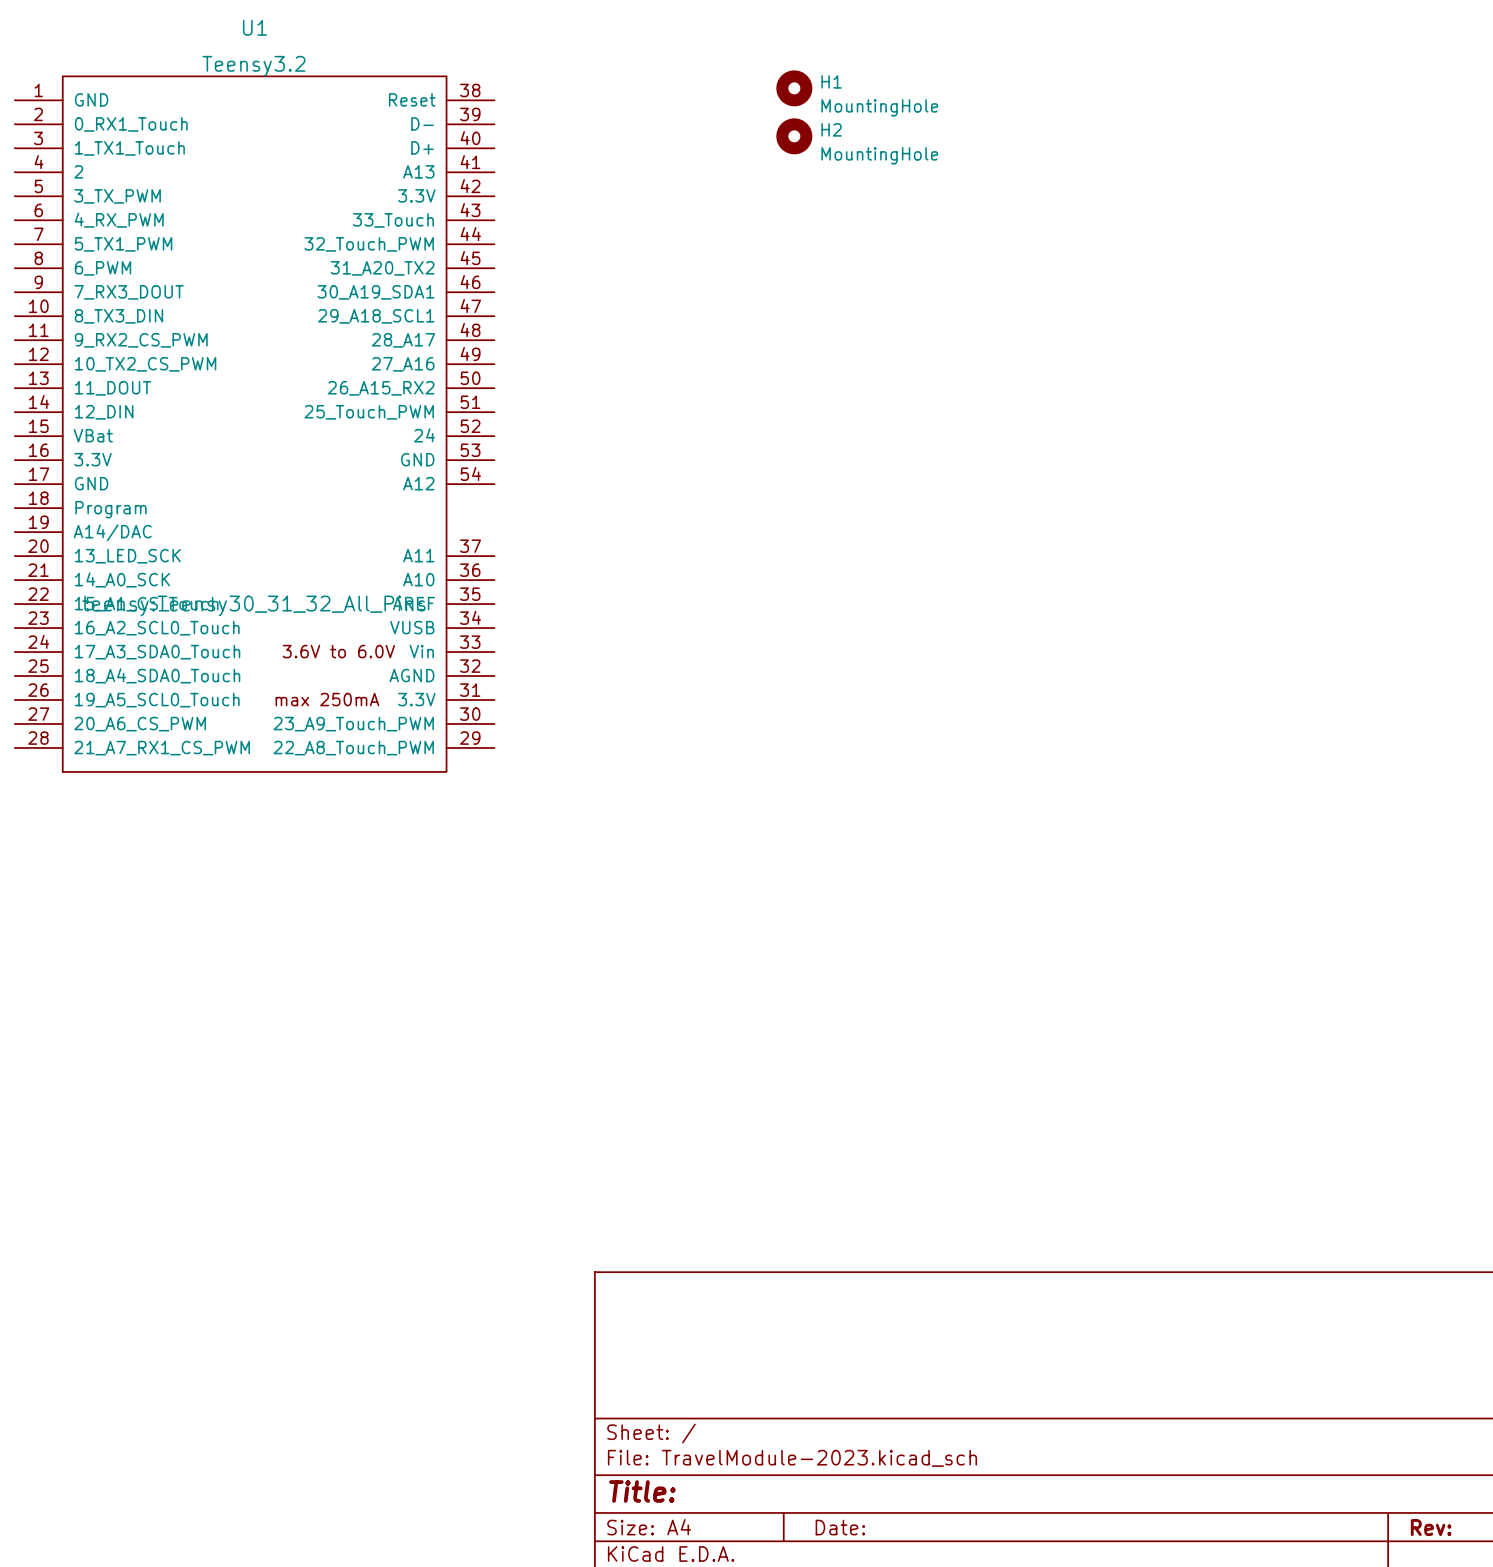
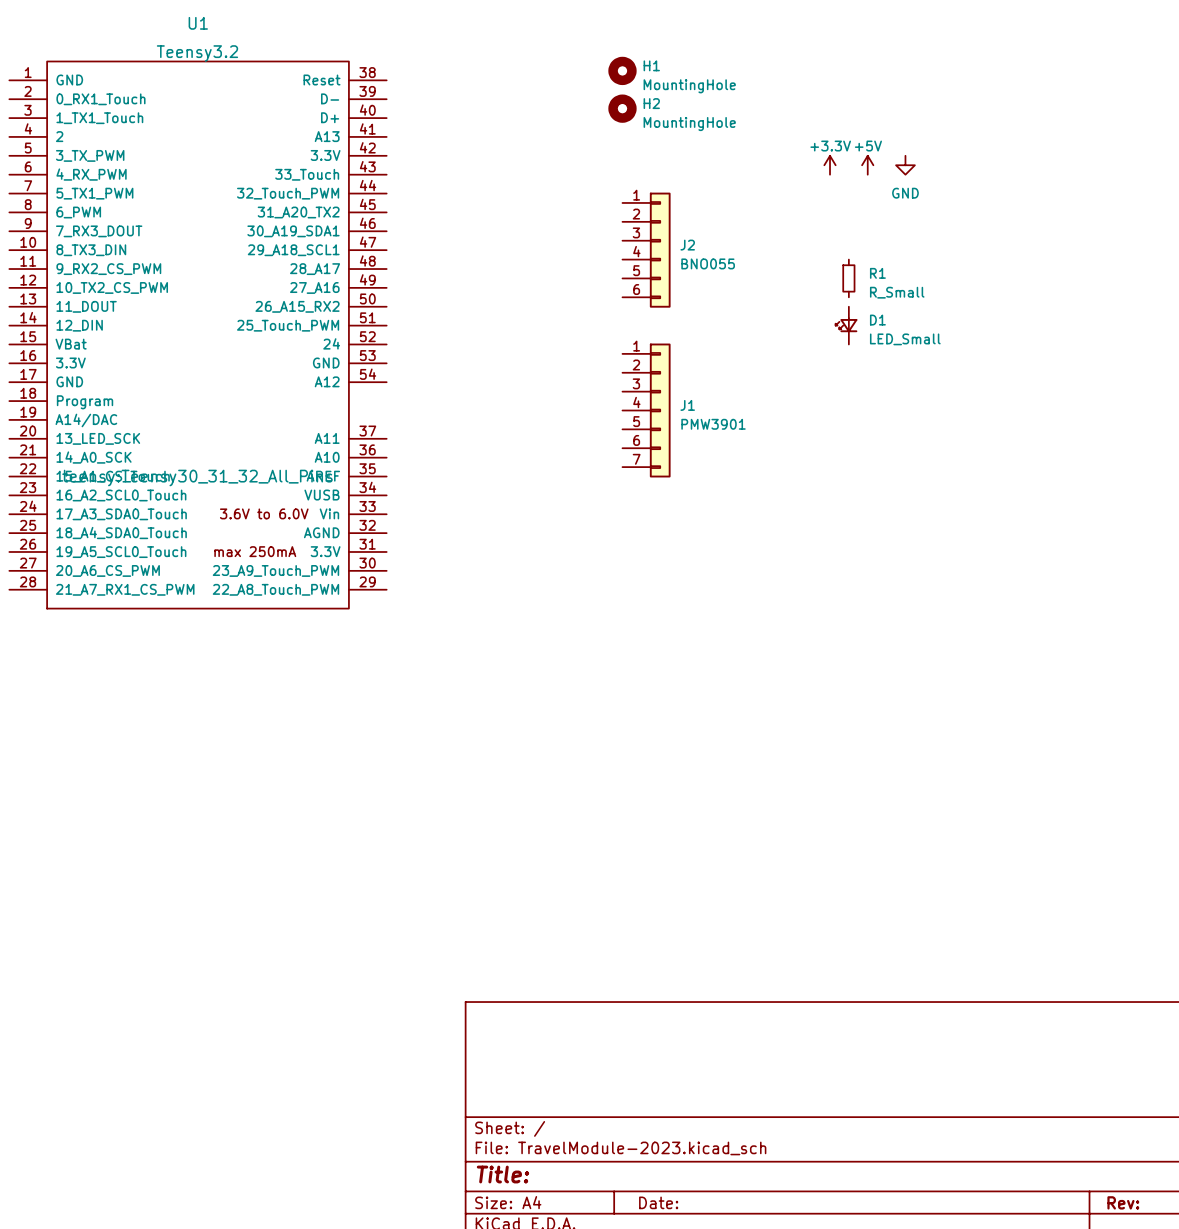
power symbol: none -> +3.3V (830, 165)
power symbol: none -> +5V (867, 165)
power symbol: none -> GND (905, 165)
J2: none -> BNO055 (646, 250)
R1: none -> R_Small (848, 278)
D1: none -> LED_Small (846, 325)
J1: none -> PMW3901 (646, 410)

